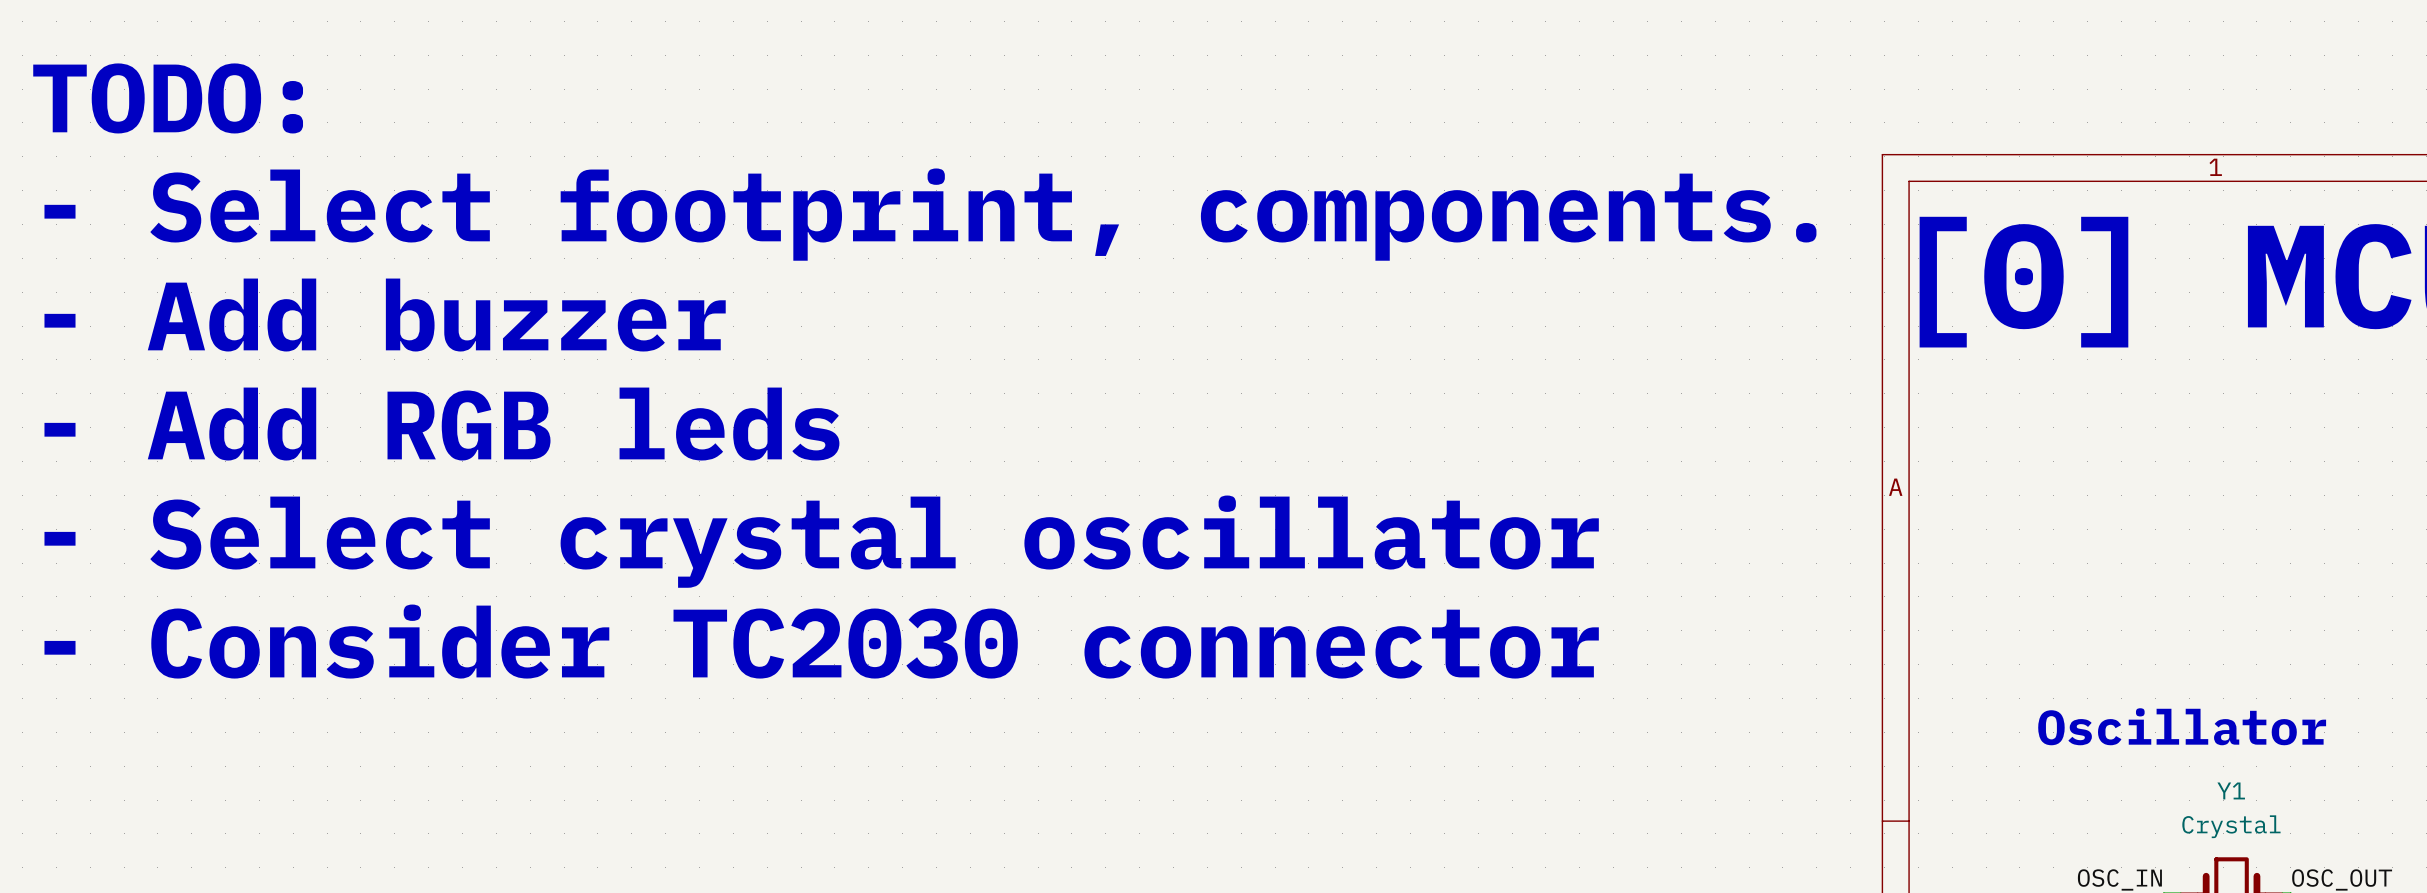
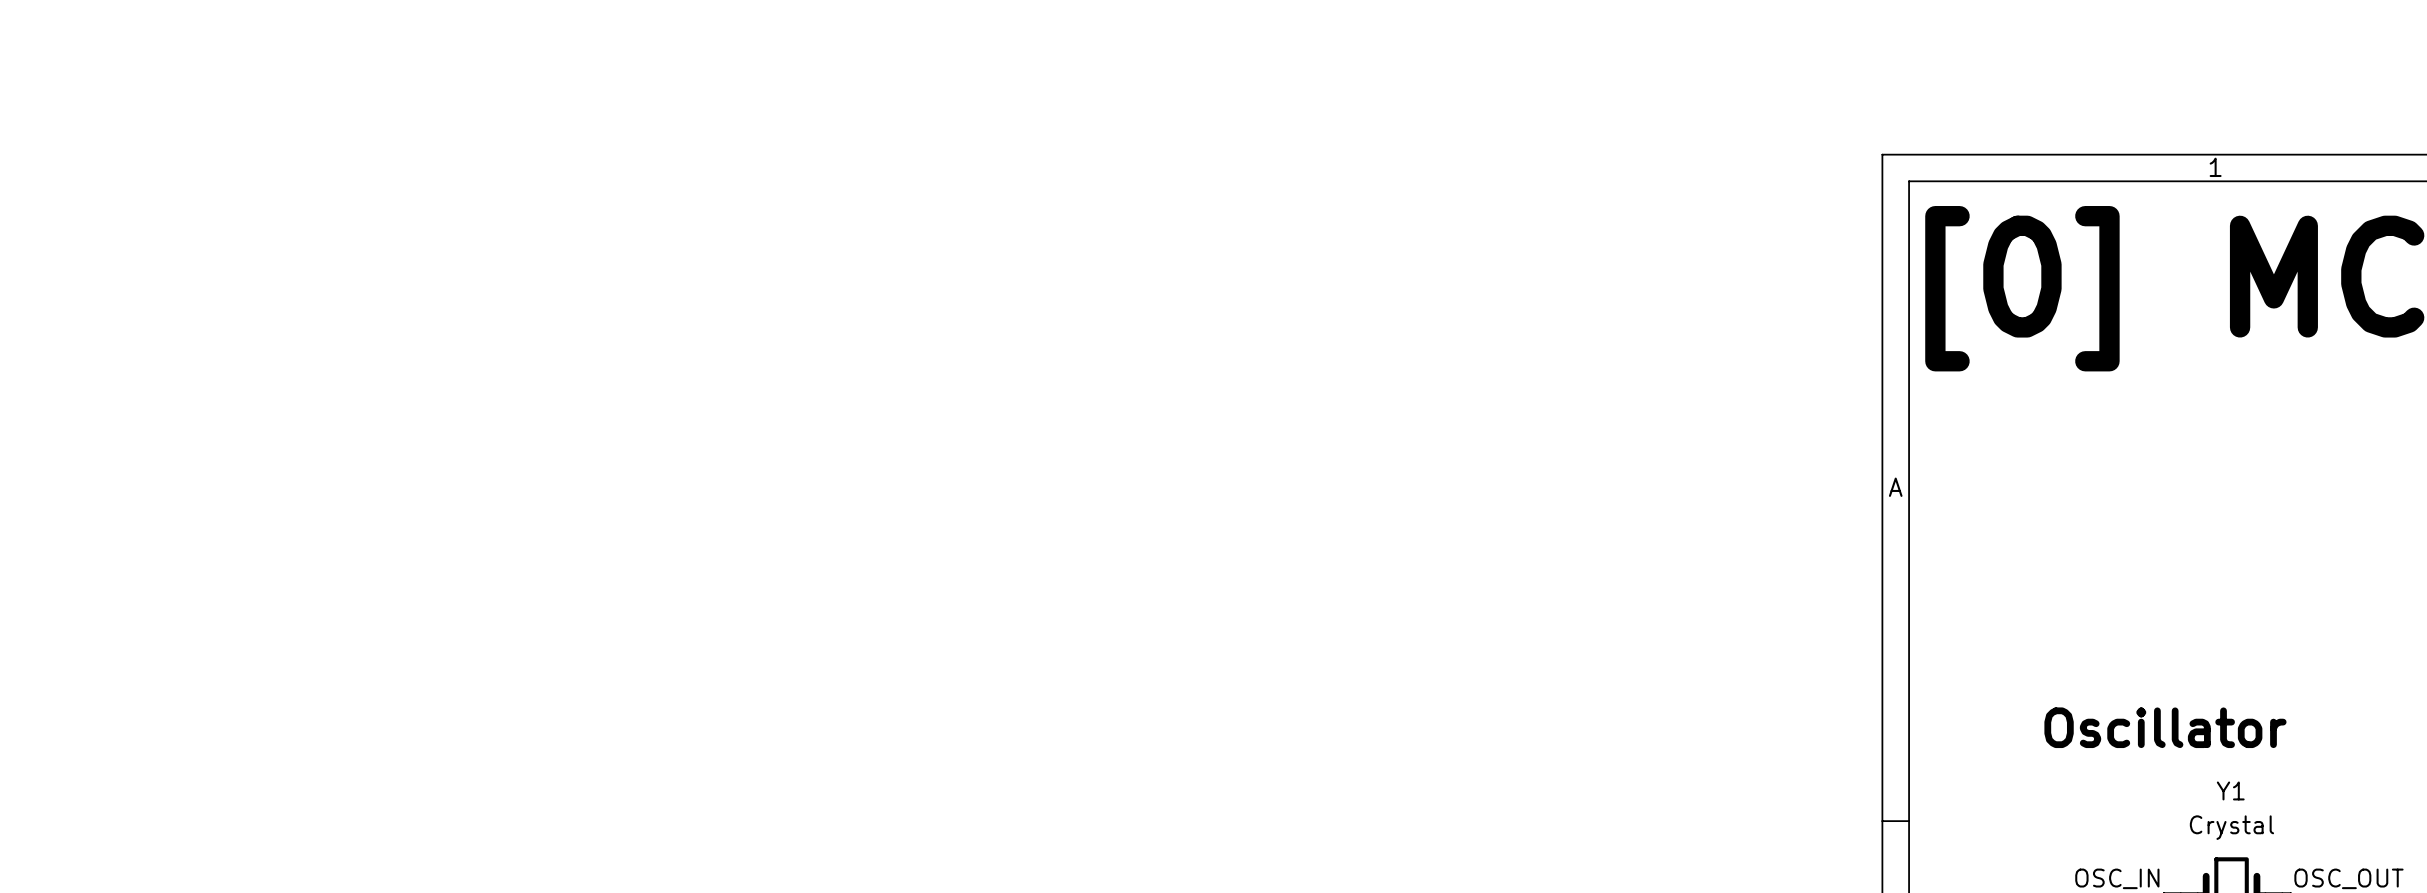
text: TODO: (168, 98) -> none
text: - Select footprint, components. (930, 214) -> none
text: - Add buzzer (385, 315) -> none
text: - Add RGB leds (441, 424) -> none
text: - Select crystal oscillator (821, 541) -> none
text: - Consider TC2030 connector (821, 641) -> none

